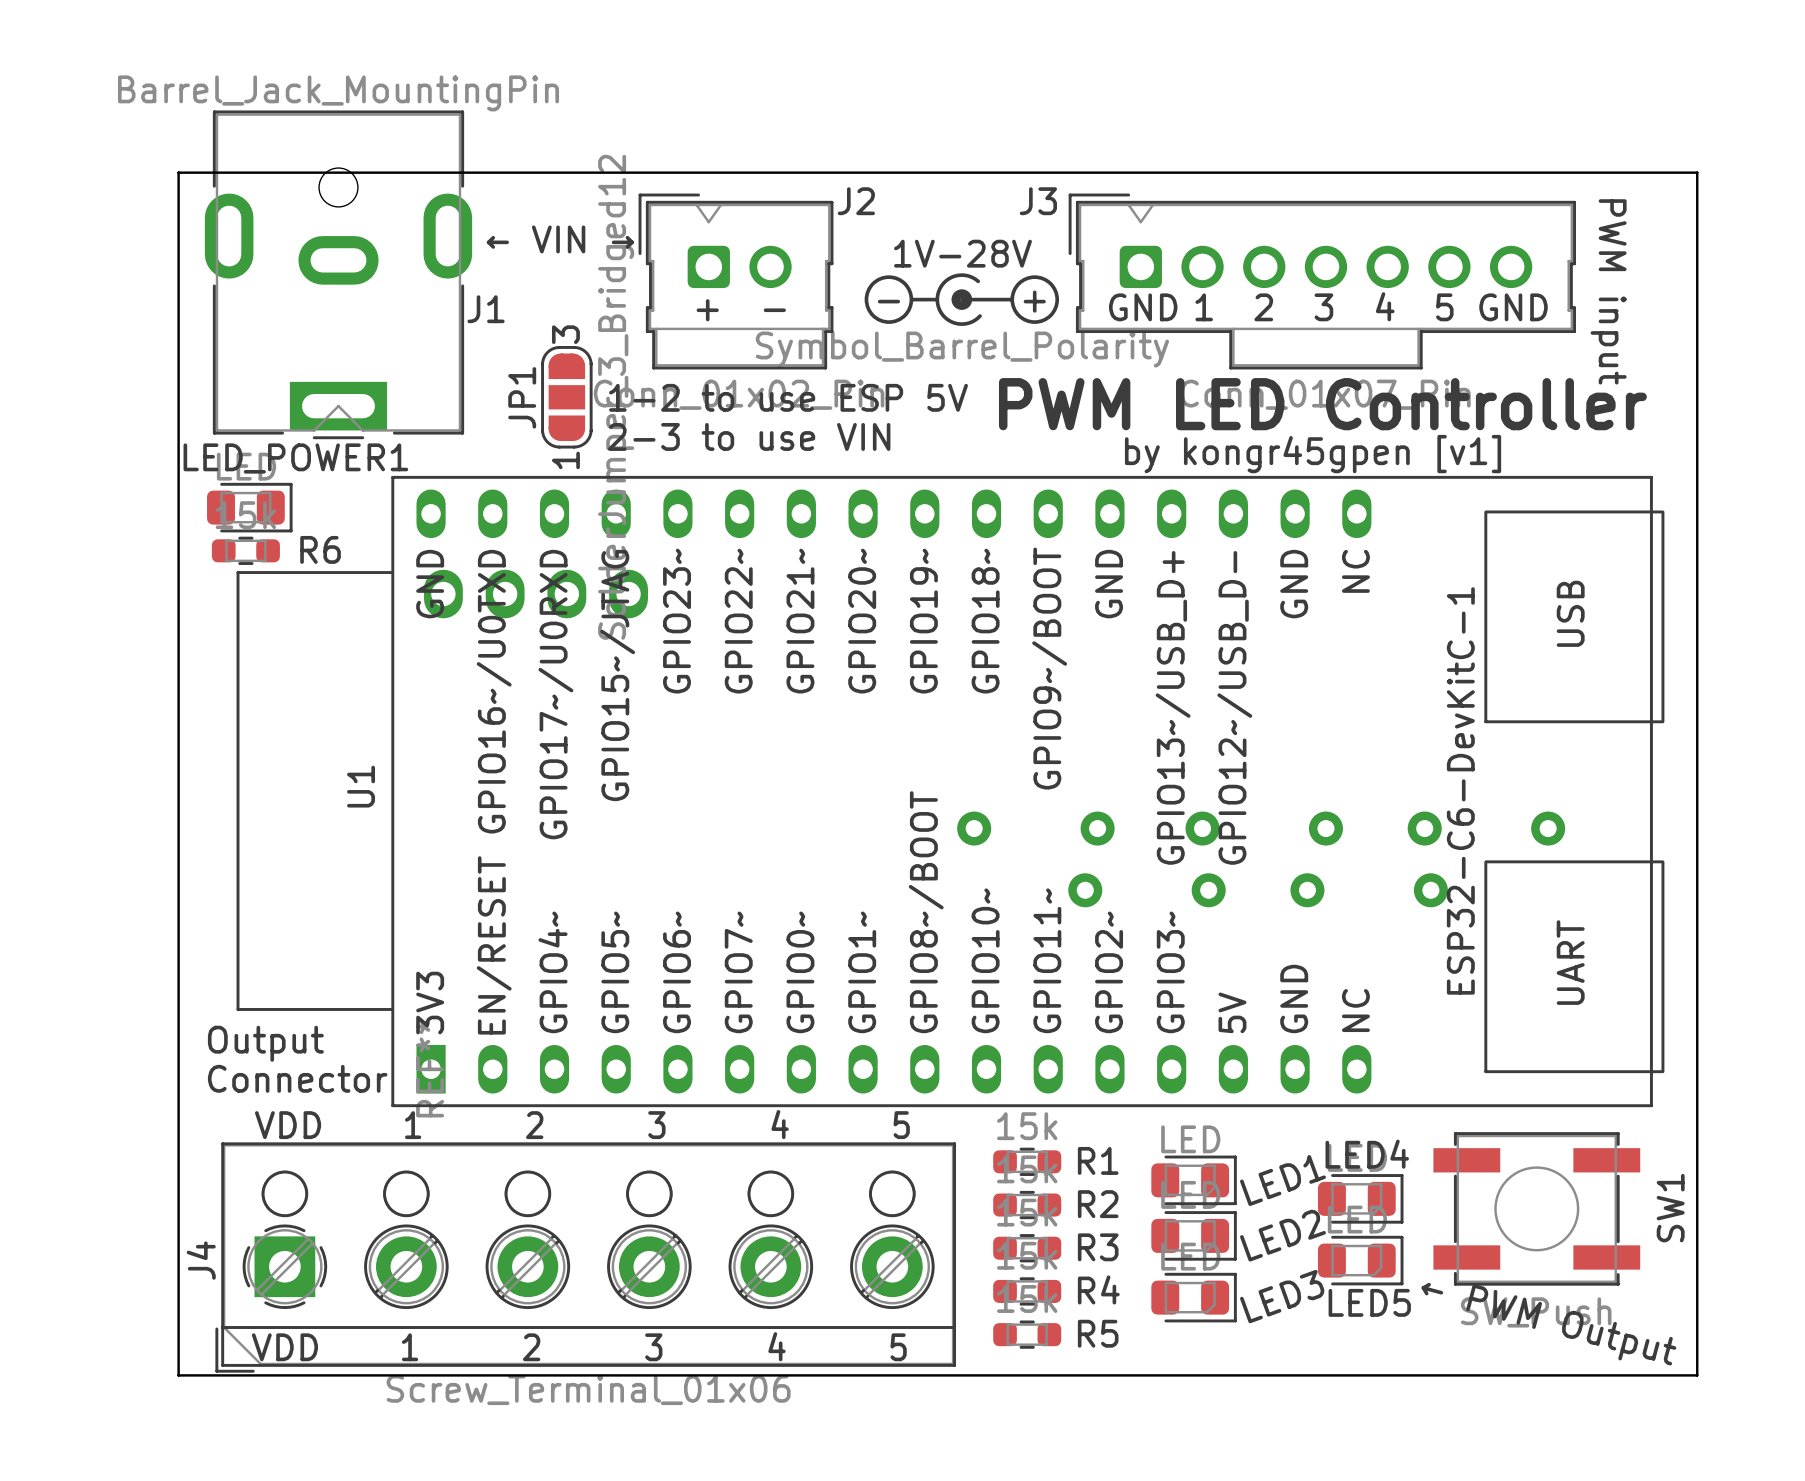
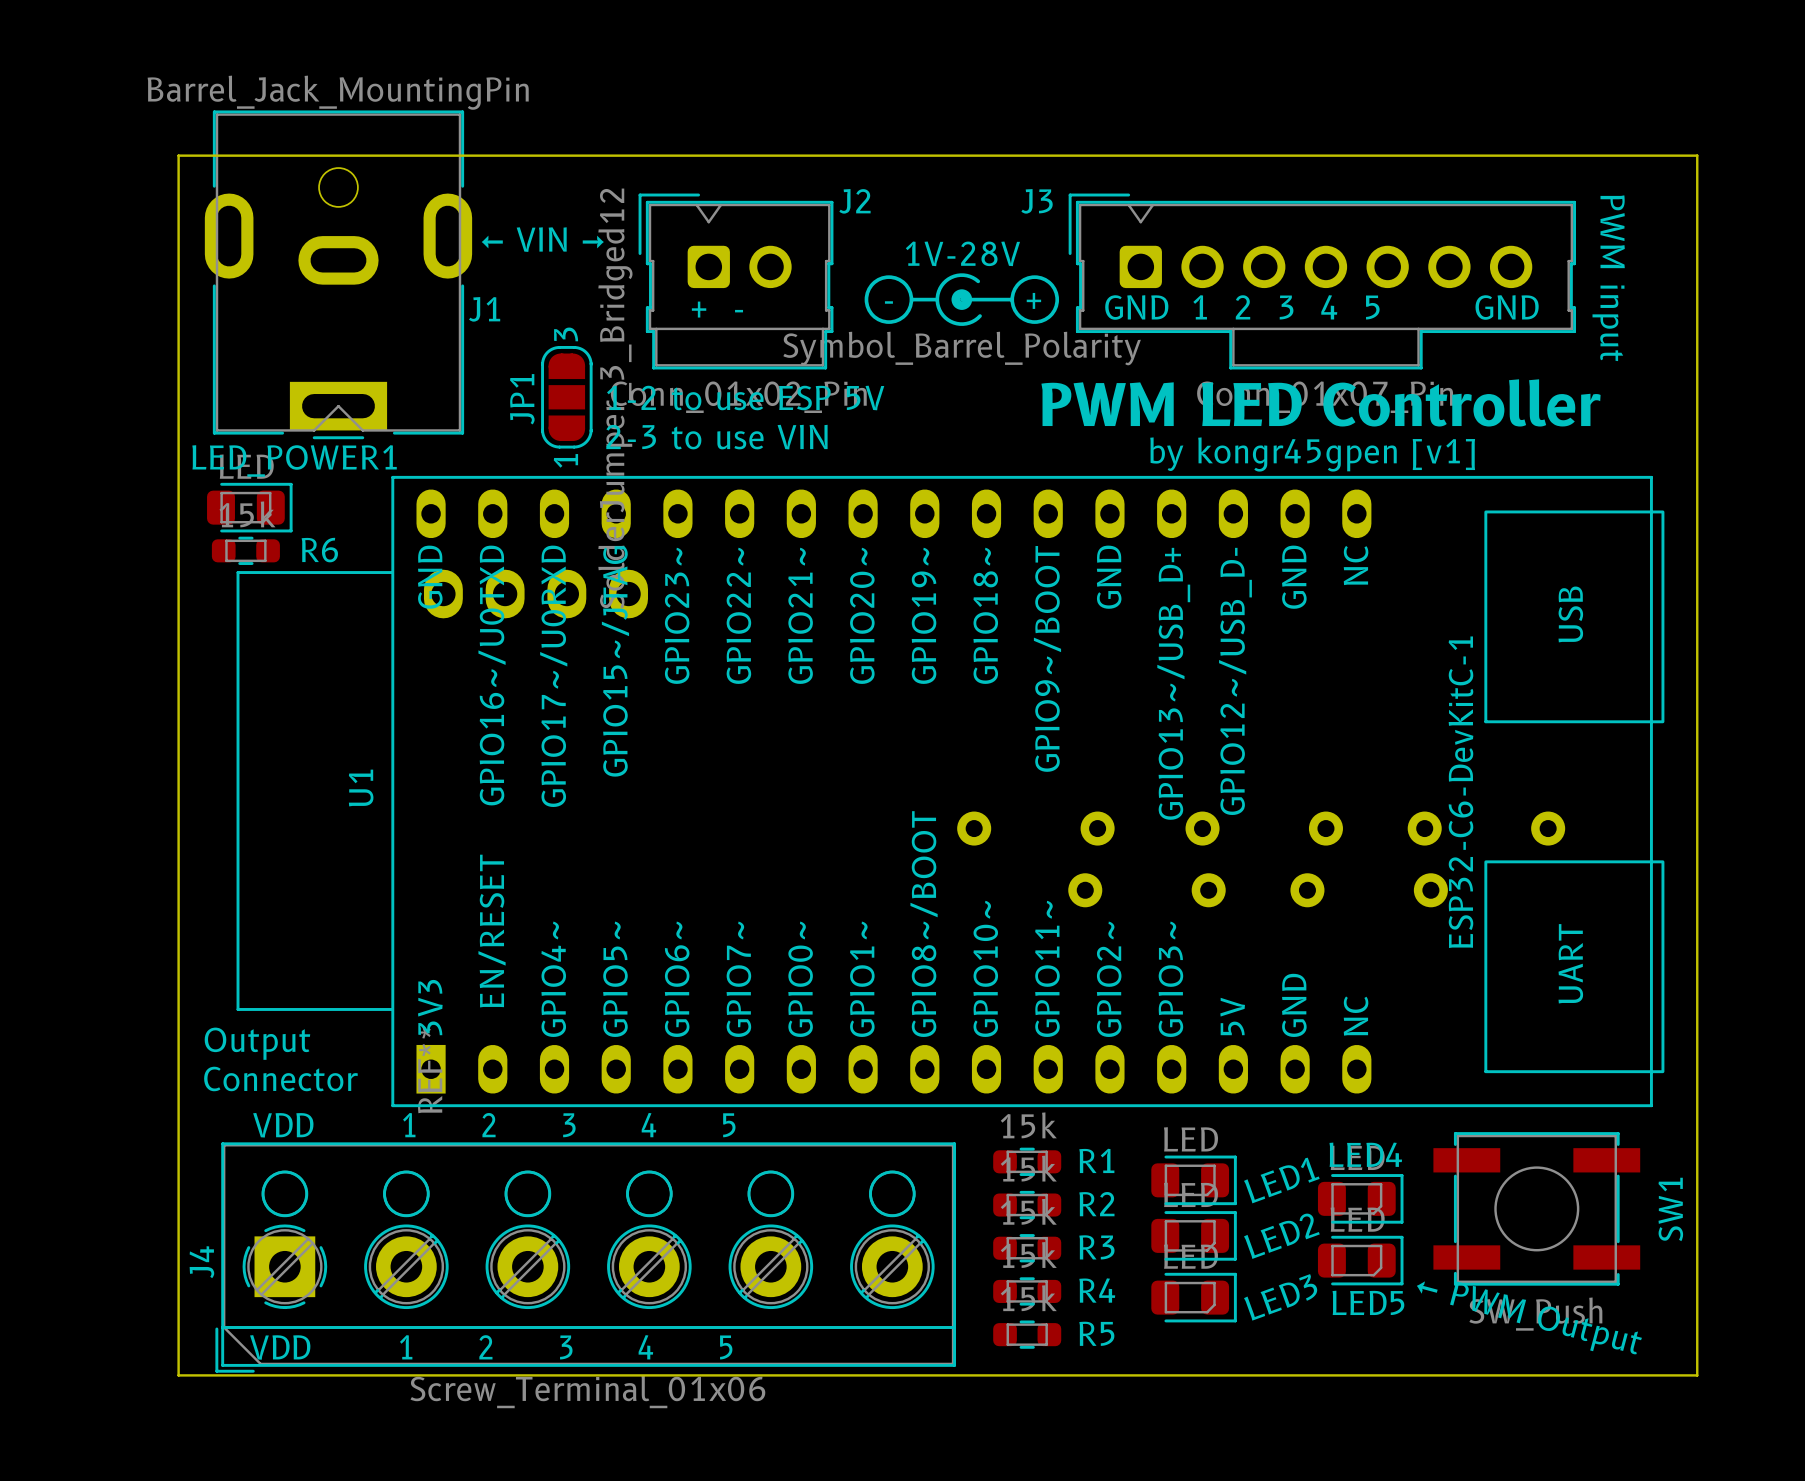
board edge: (178, 172) (1697, 172) -> (178, 172) (178, 155) (1697, 155) (1697, 172)

